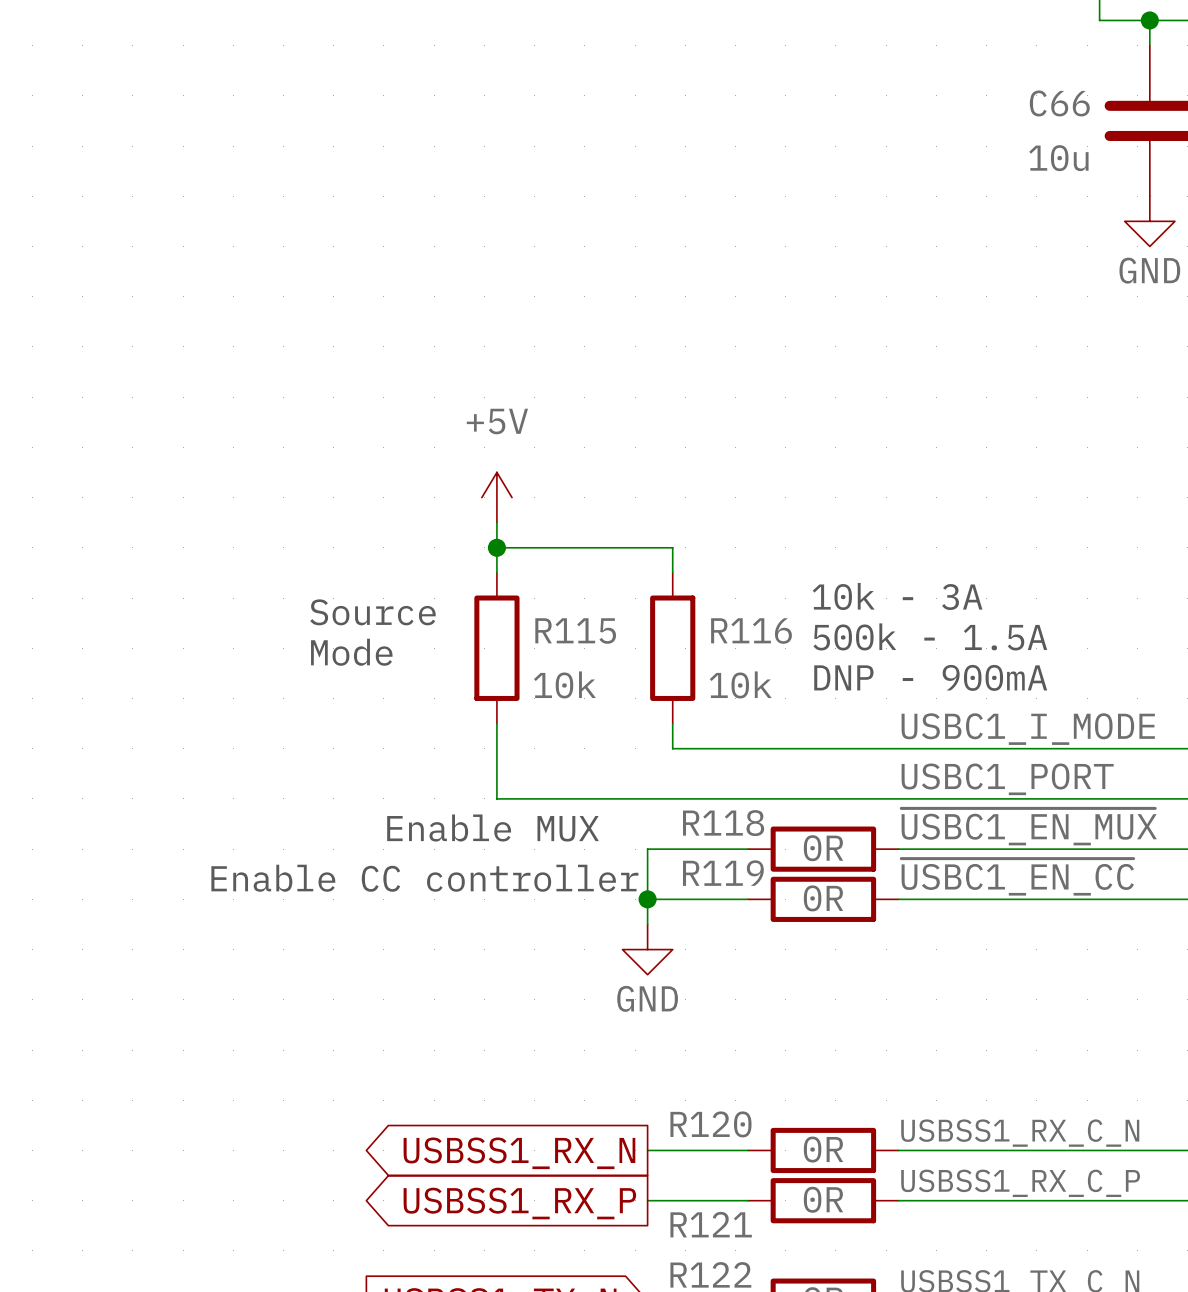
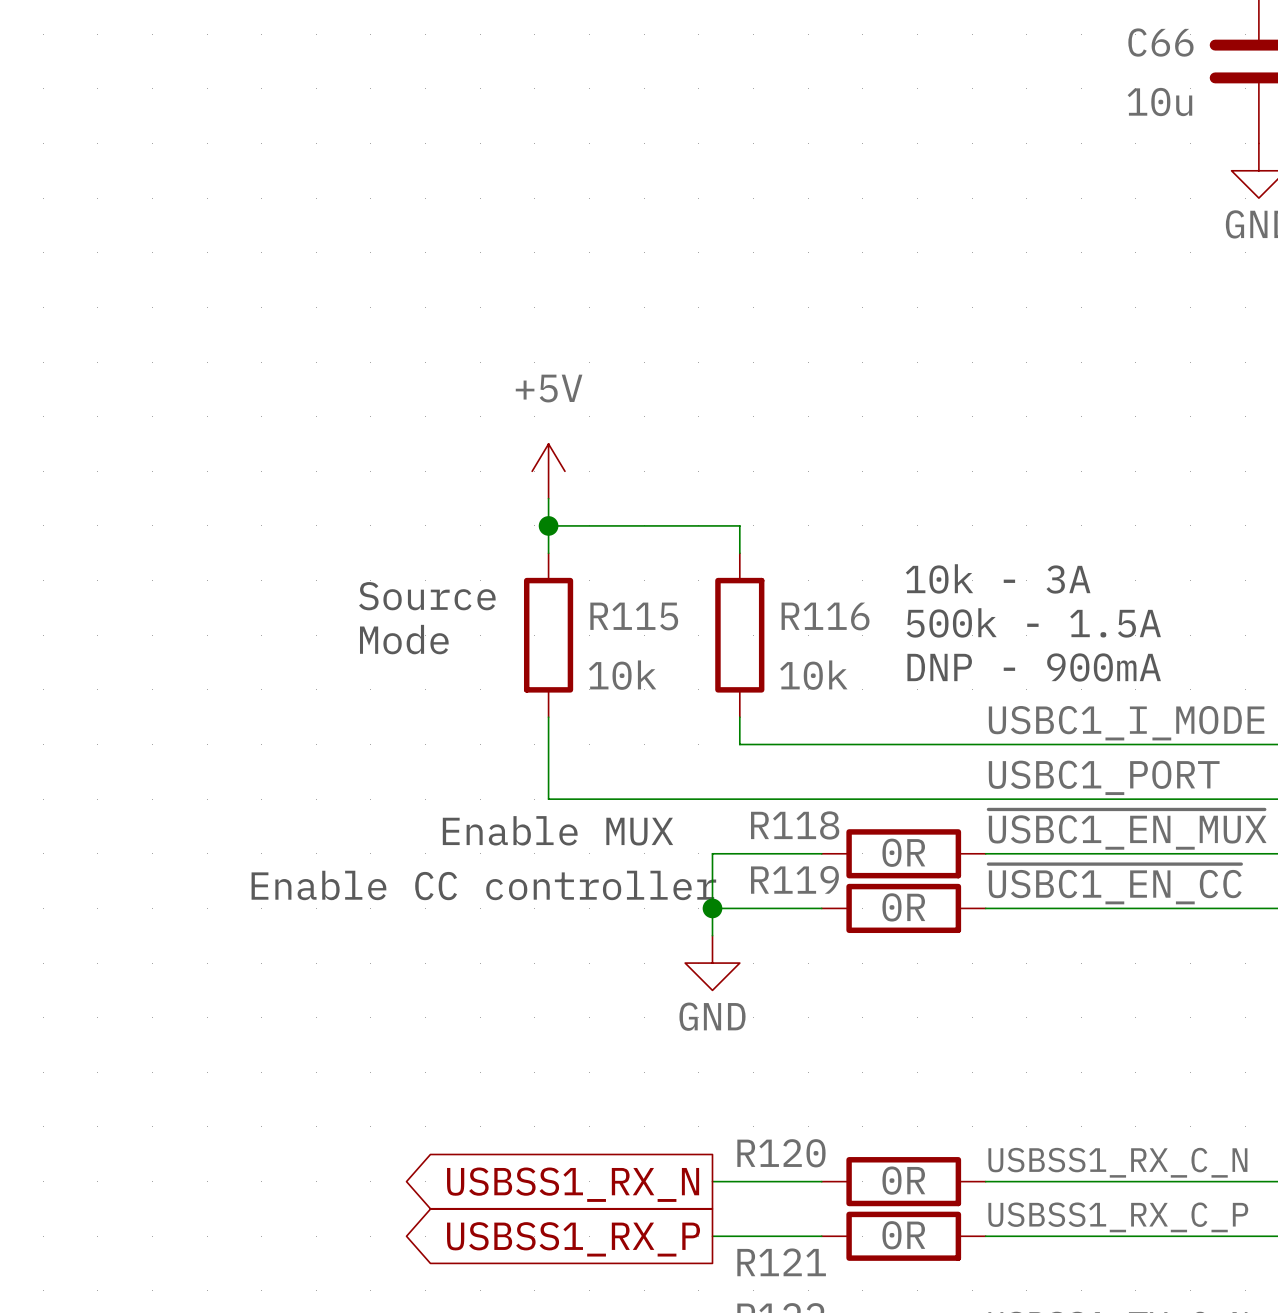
text position: 10k - 3A (897, 596) -> 10k - 3A (998, 578)
text position: Source (372, 612) -> Source (427, 596)
text position: 500k - 1.5A (930, 636) -> 500k - 1.5A (1033, 622)
text position: Mode (351, 652) -> Mode (404, 639)
text position: DNP - 900mA (930, 677) -> DNP - 900mA (1034, 667)
text position: Enable MUX (493, 828) -> Enable MUX (557, 830)
text position: Enable CC controller (424, 878) -> Enable CC controller (483, 885)

